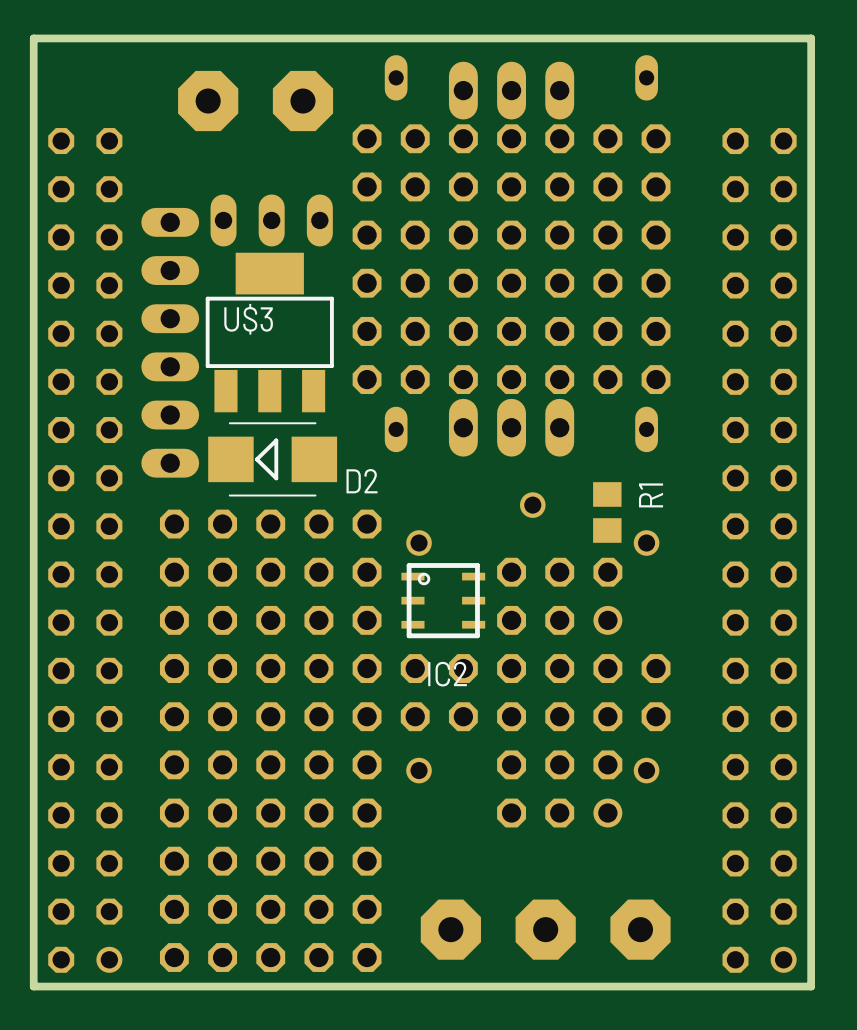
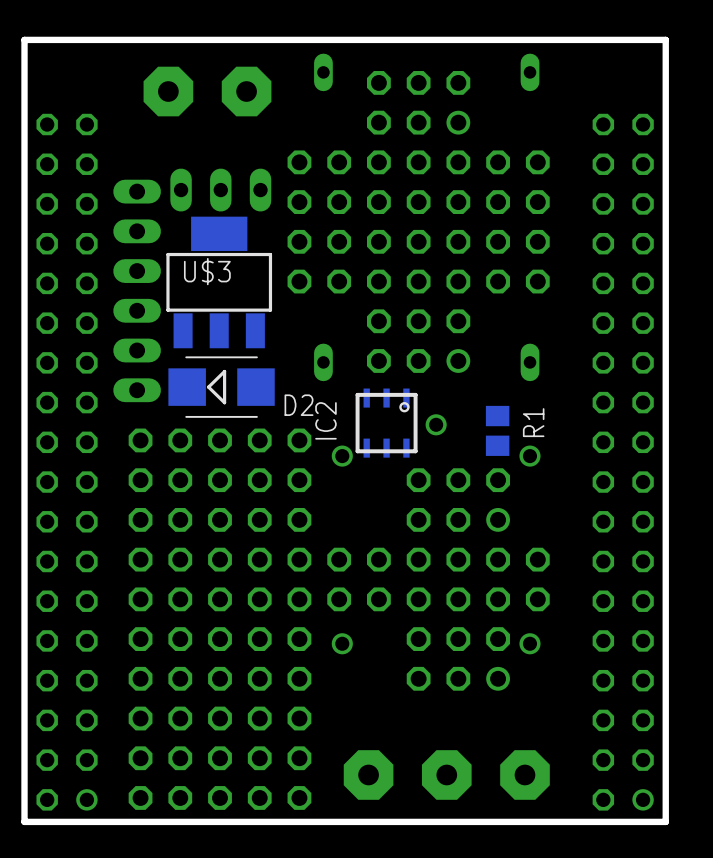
part: (511, 90) -> none
part: none -> (418, 102)
part: (511, 162) -> none
part: (511, 355) -> none
part: none -> (418, 341)
part: (511, 427) -> none
IC2 rotation: 0° (443, 600) -> 90° clockwise (386, 423)
IC2 position: (443, 600) -> (386, 423)

